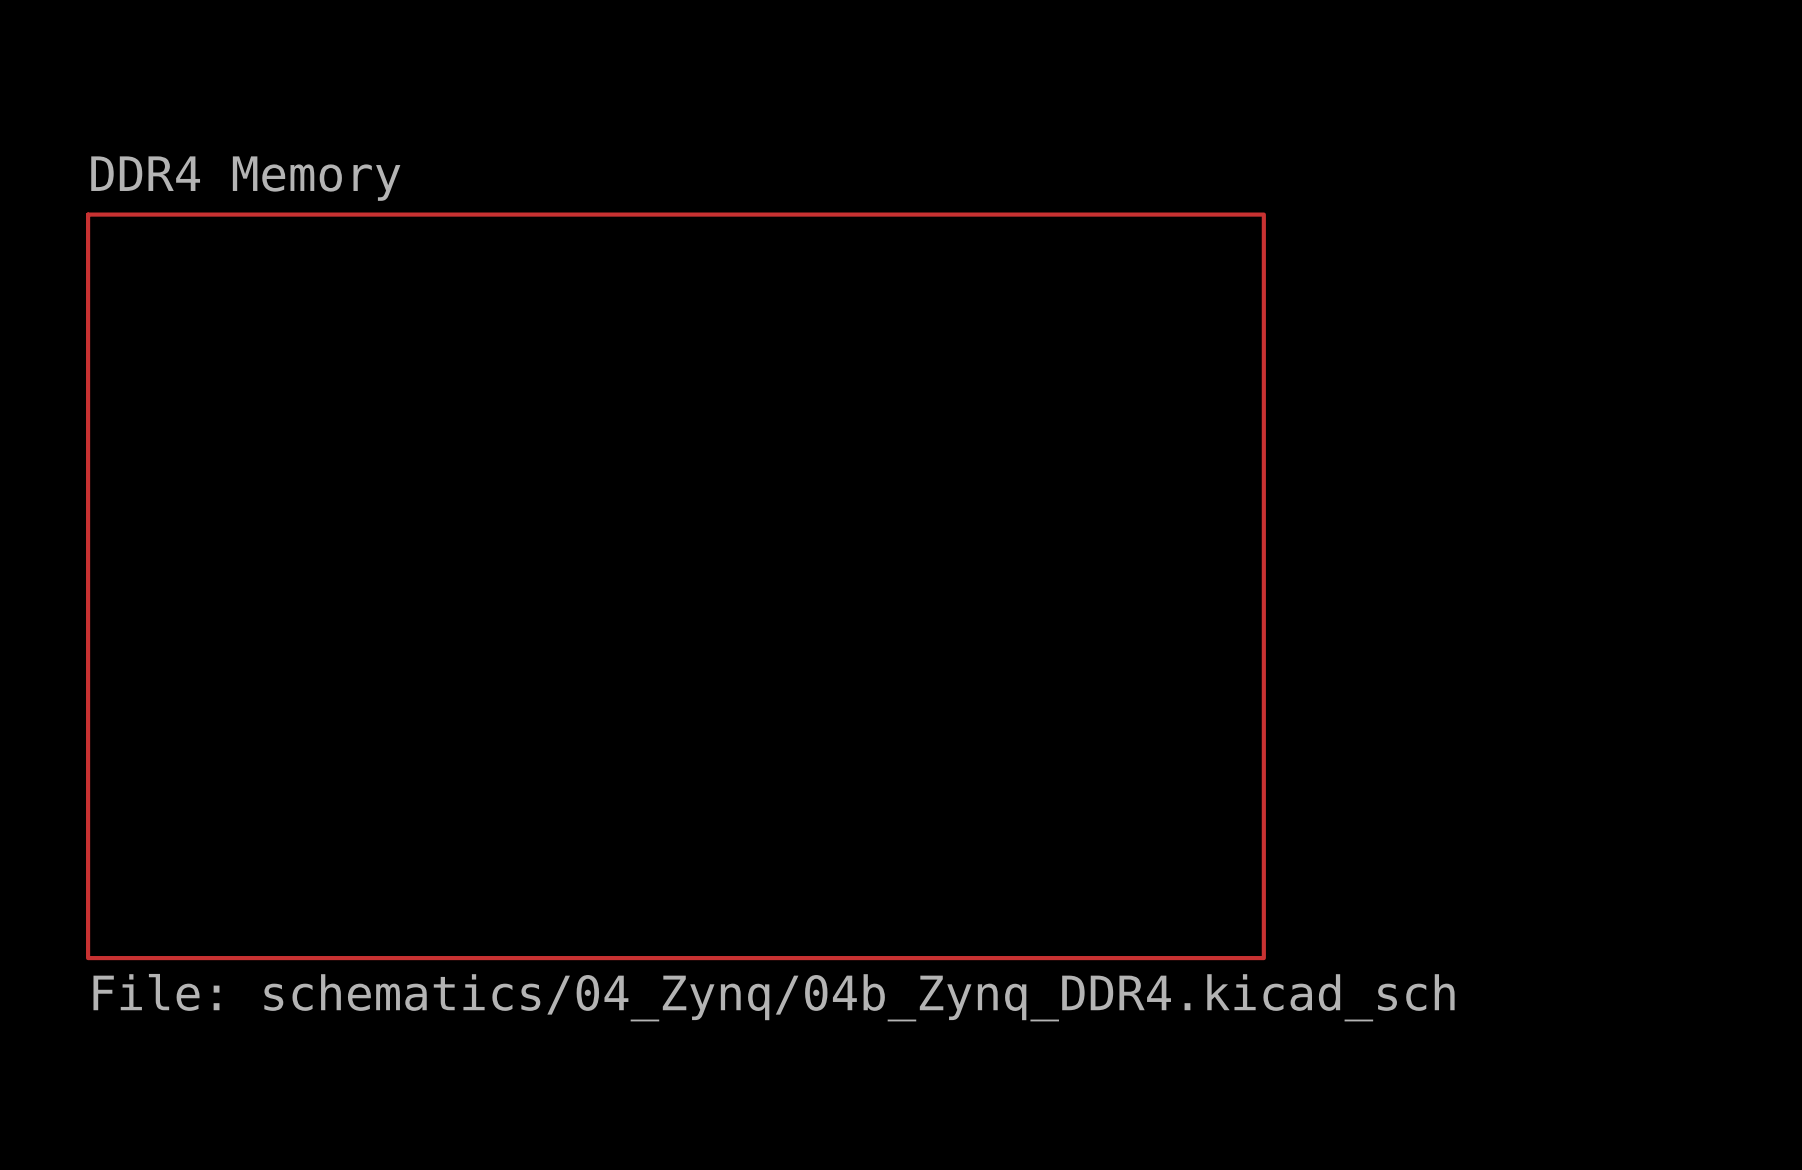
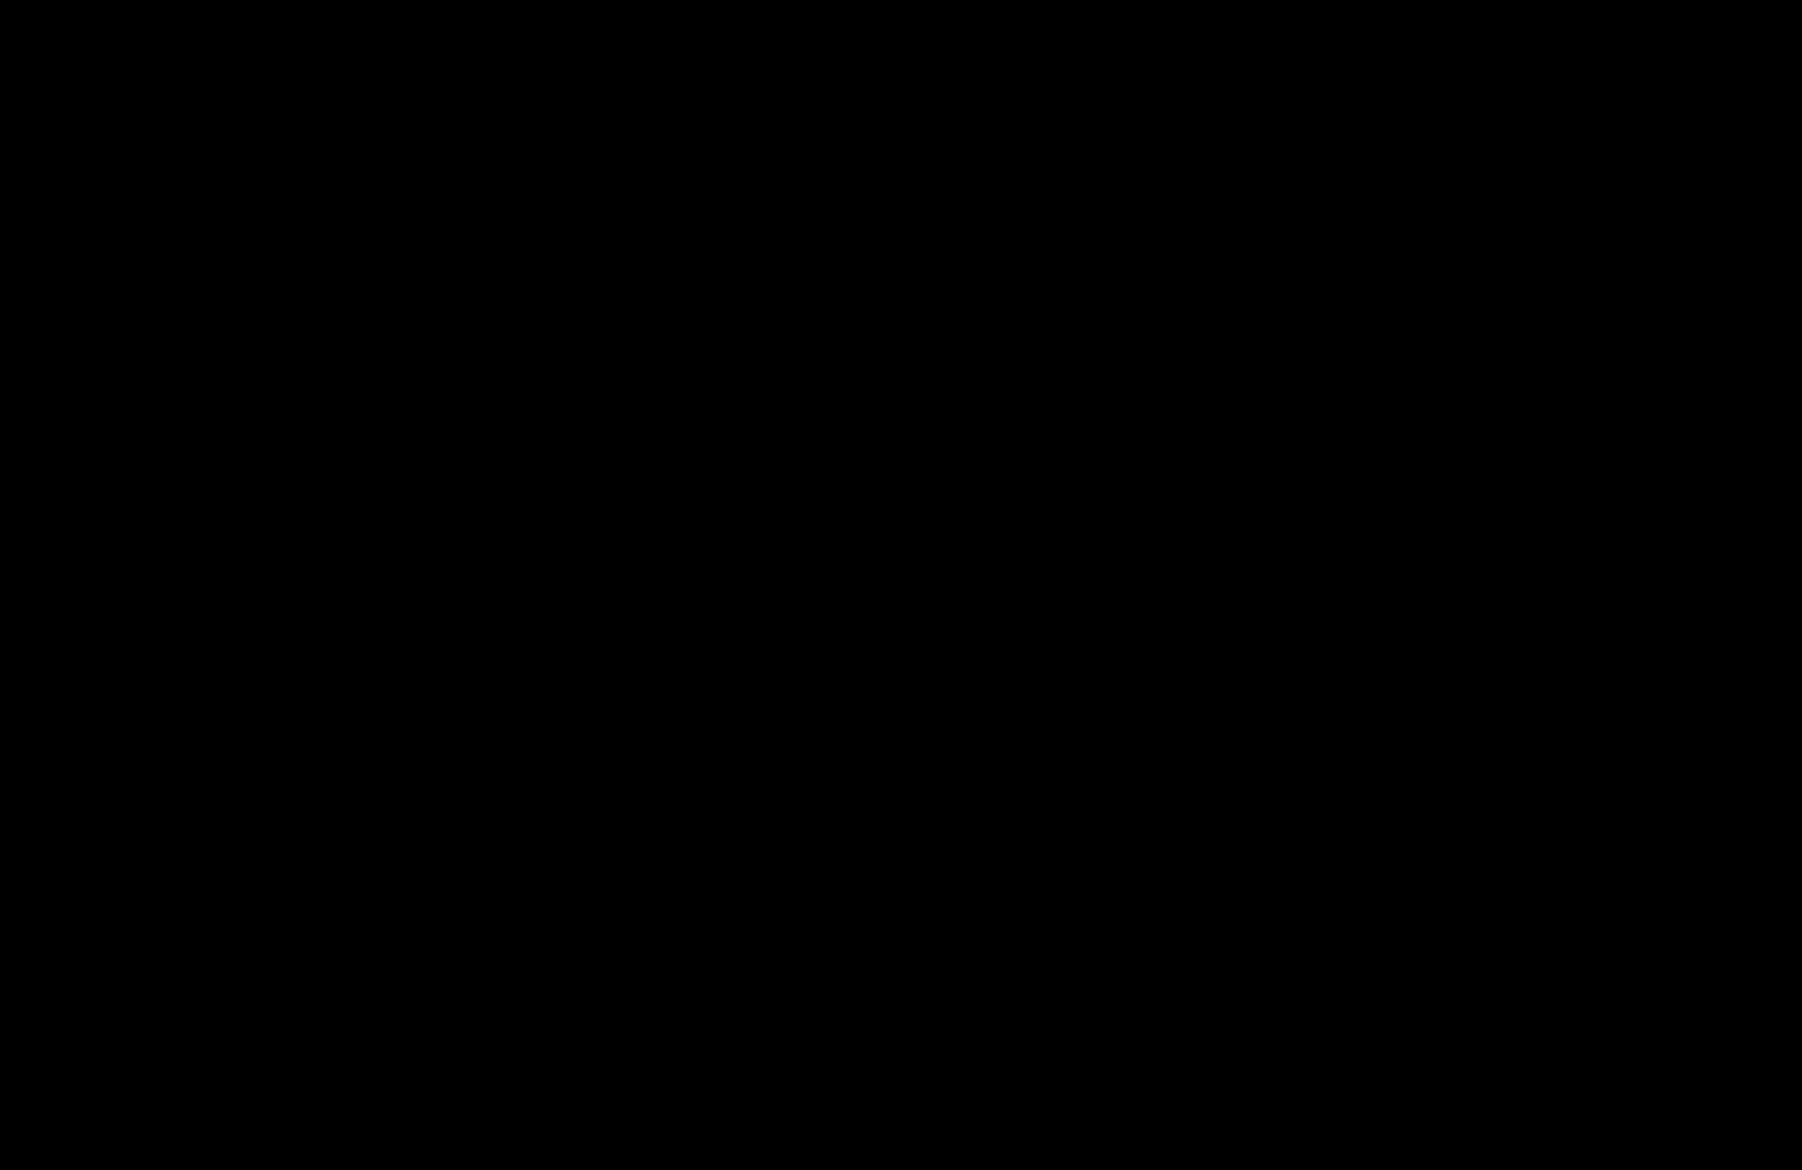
sheet DDR4 Memory: File: schematics/04_Zynq/04b_Zynq_DDR4.kicad_sch (675, 586) -> none

